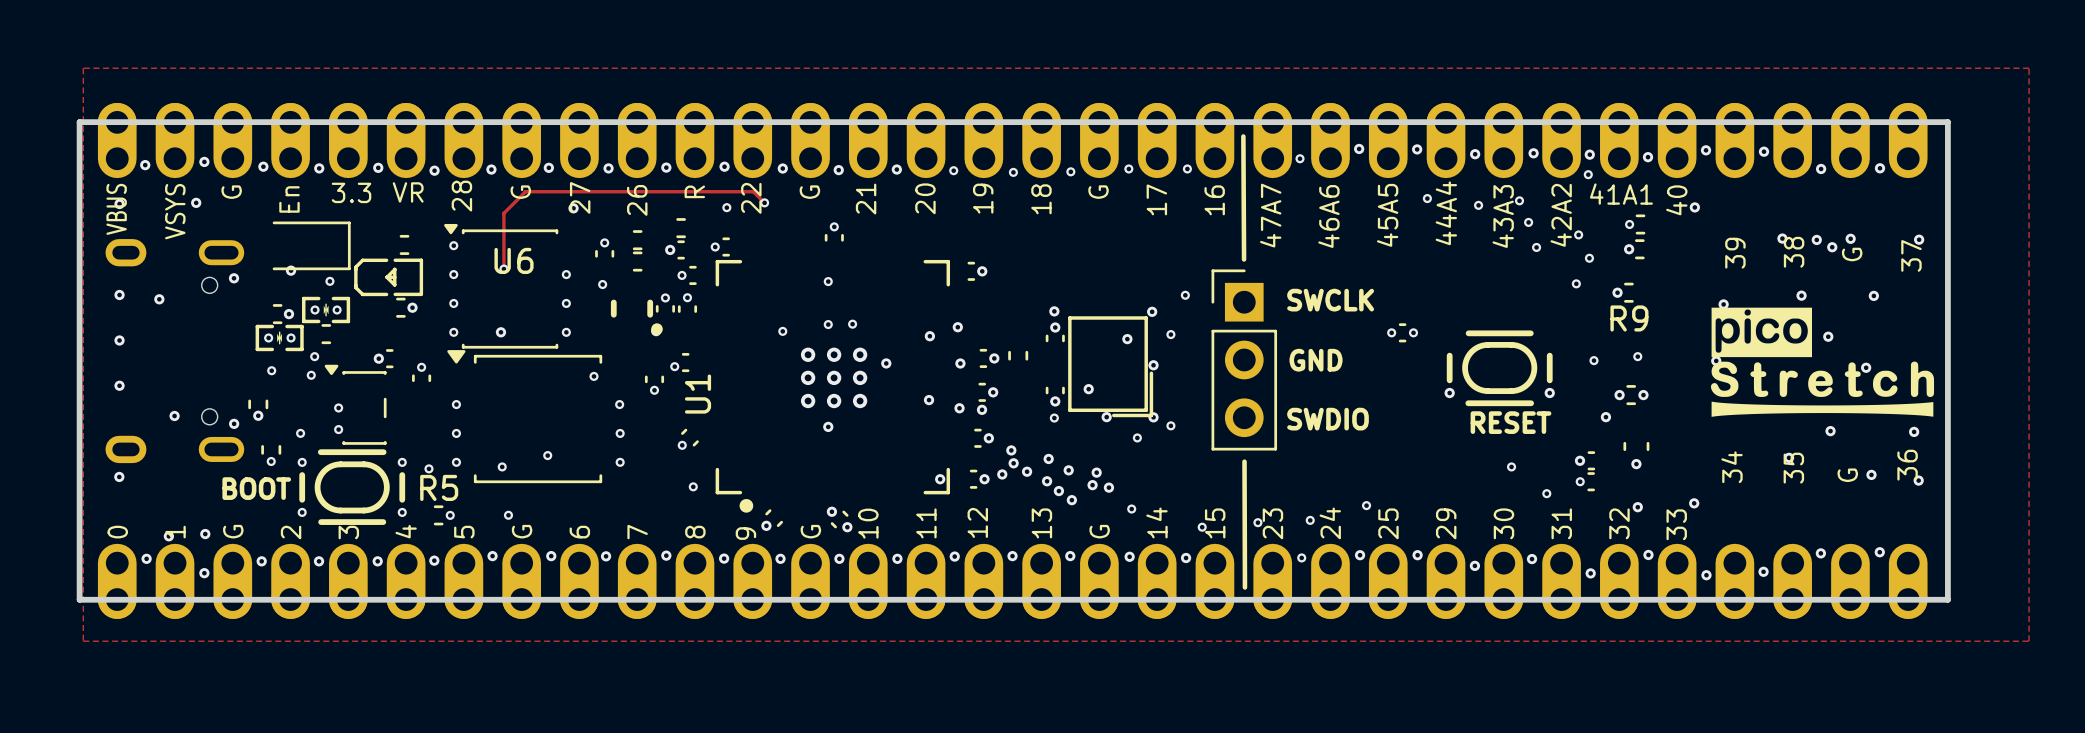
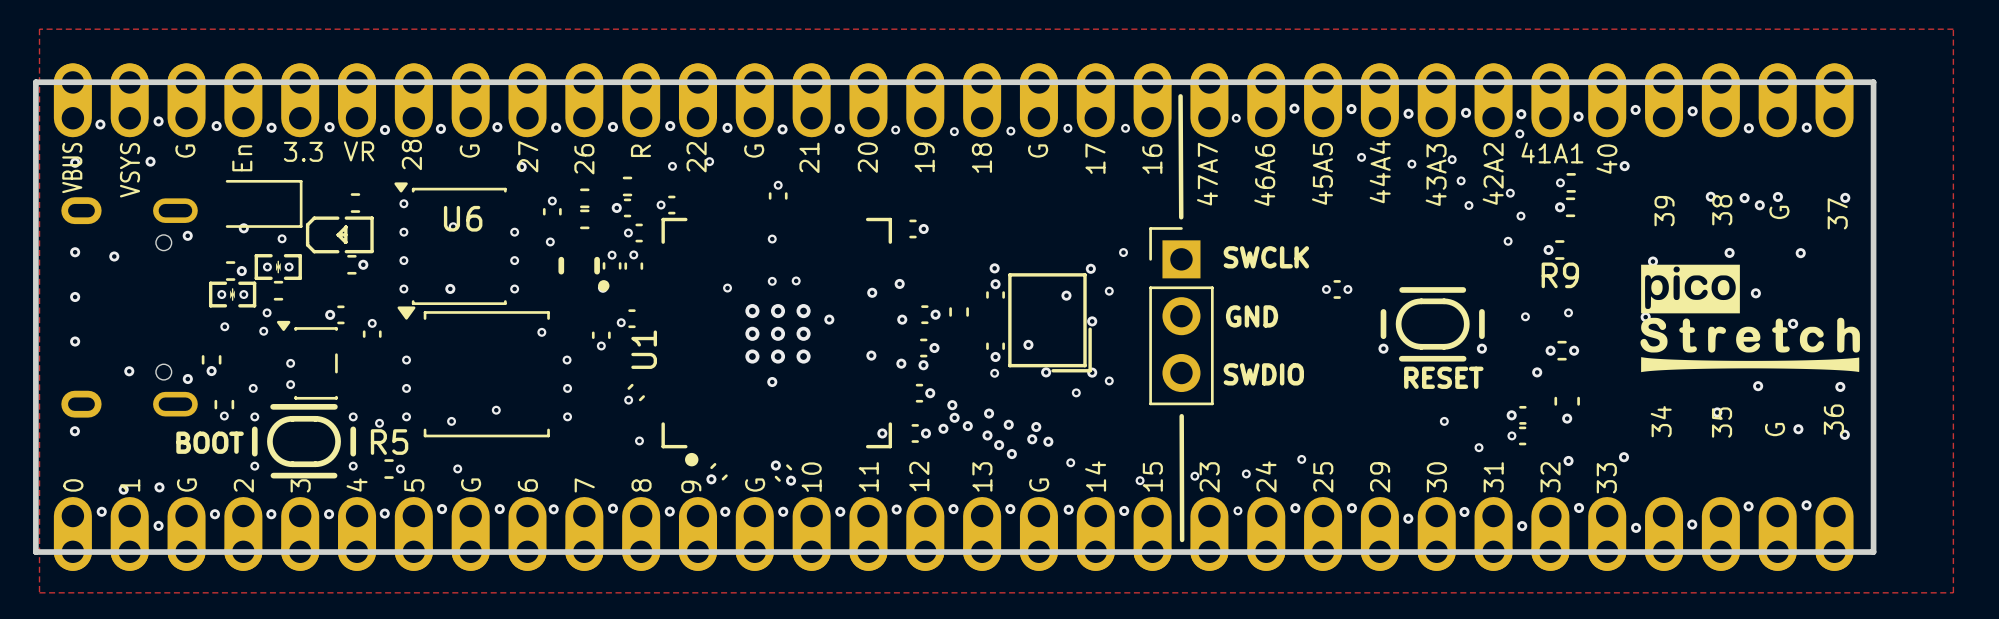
track: (764, 202) (753, 191) (525, 191) (503, 213) (503, 269) -> none

